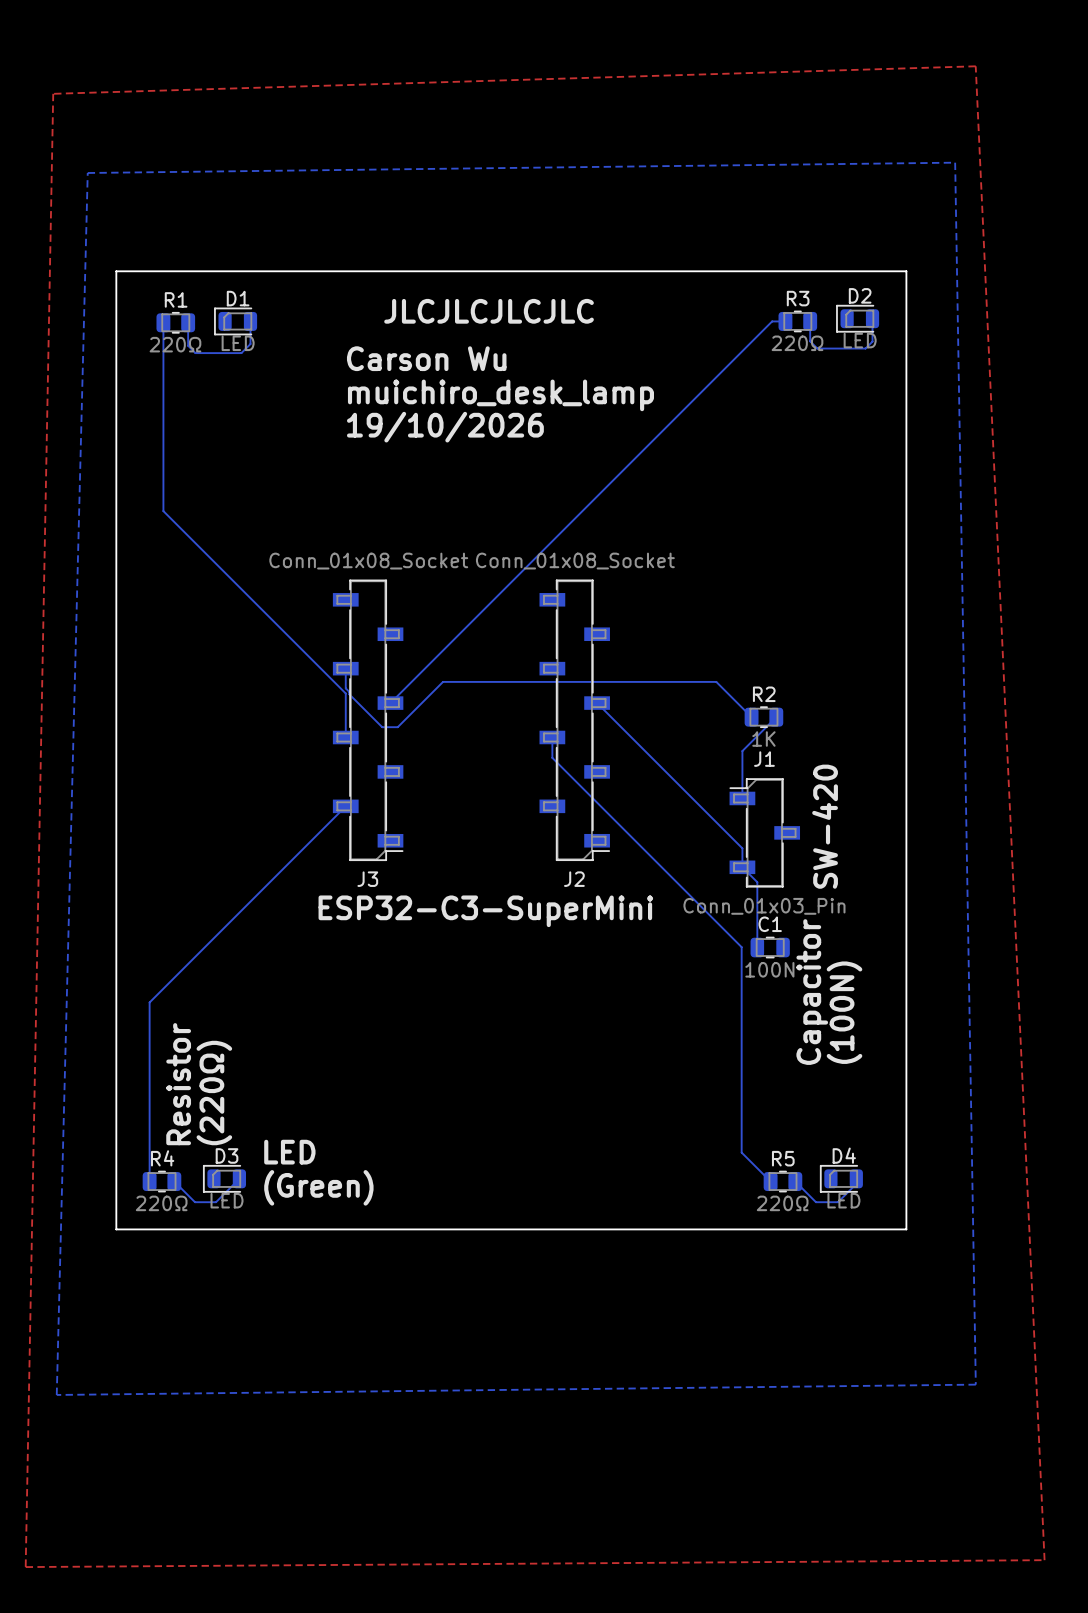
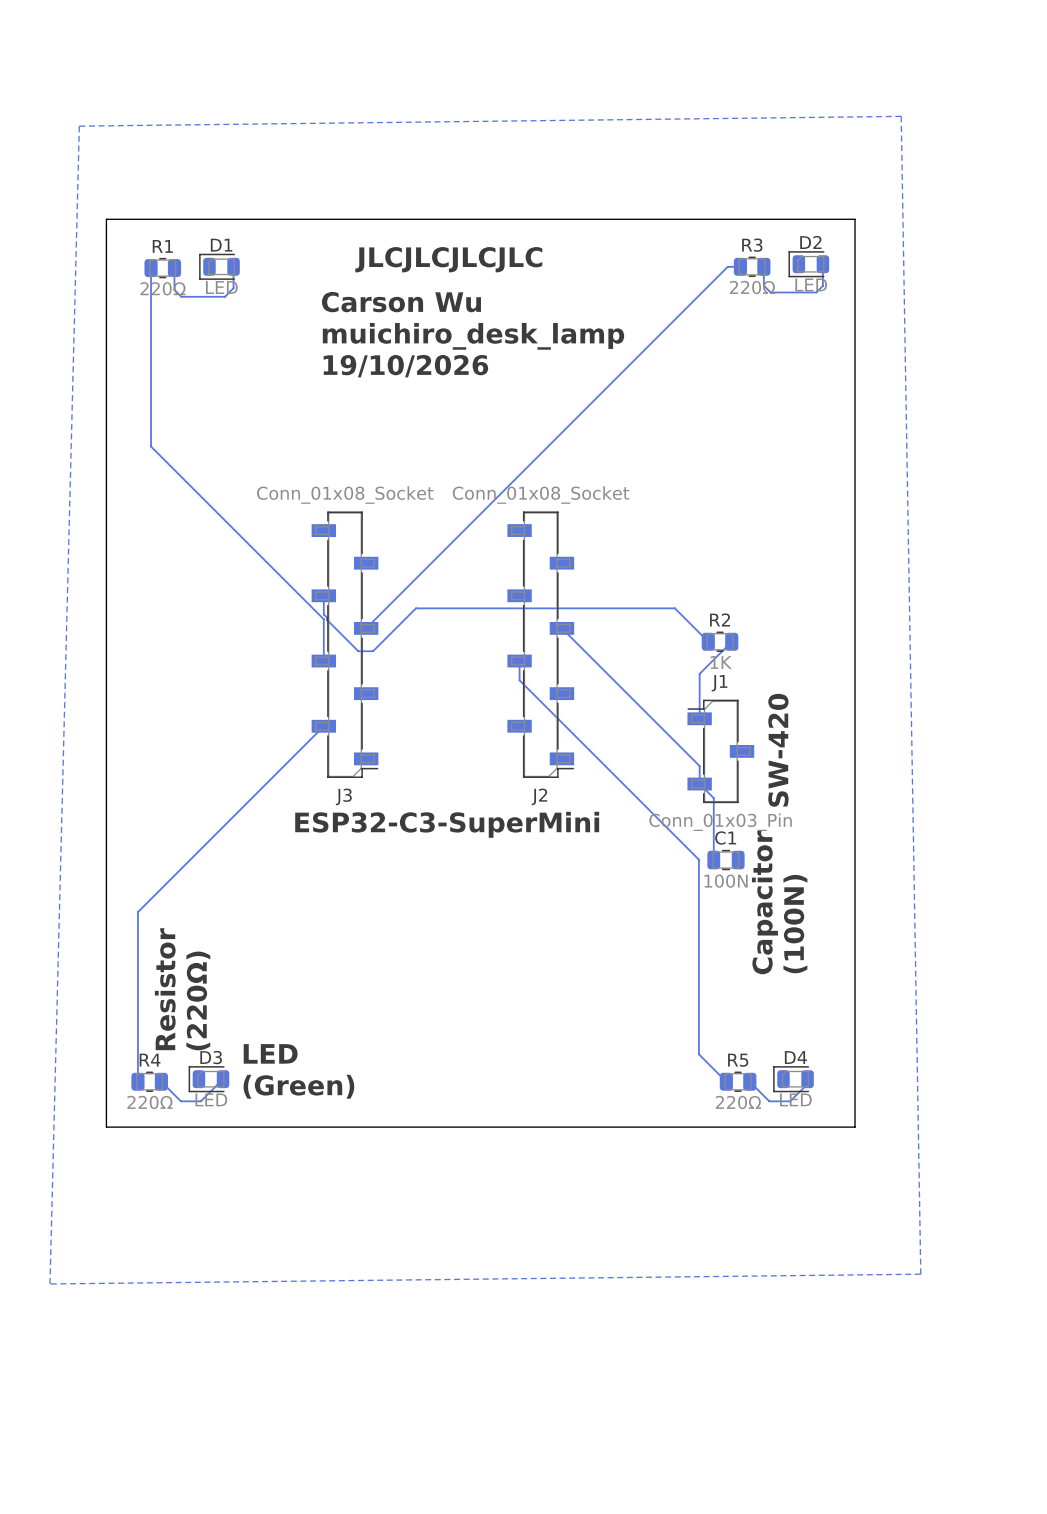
top zone outline: (975, 66) (53, 93) (25, 1567) (1044, 1560) (975, 66) -> none

